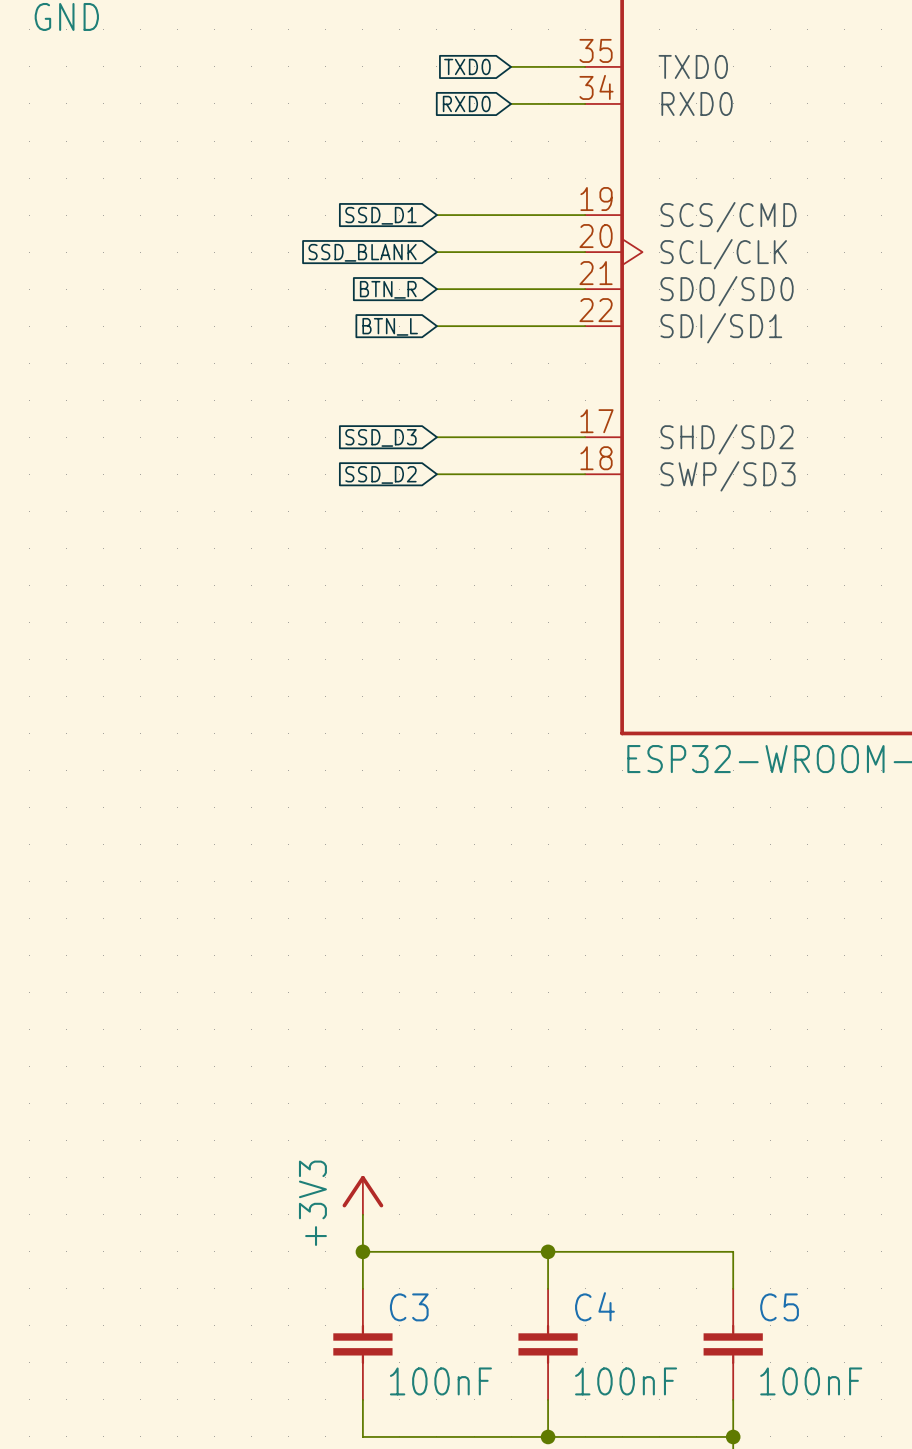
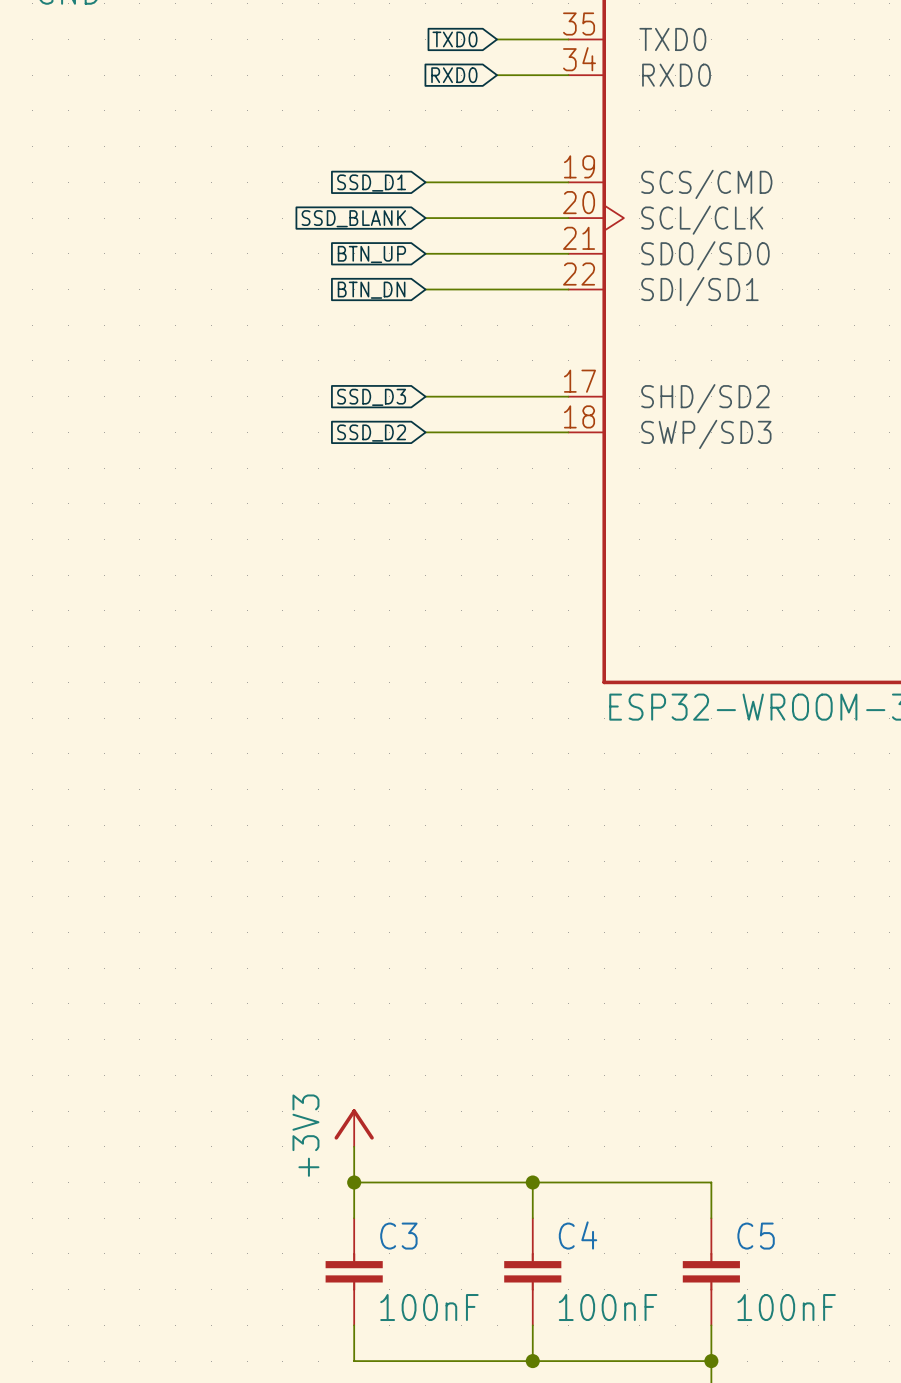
global label: BTN_R (388, 289) -> BTN_UP (371, 254)
global label: BTN_L (390, 326) -> BTN_DN (371, 290)

